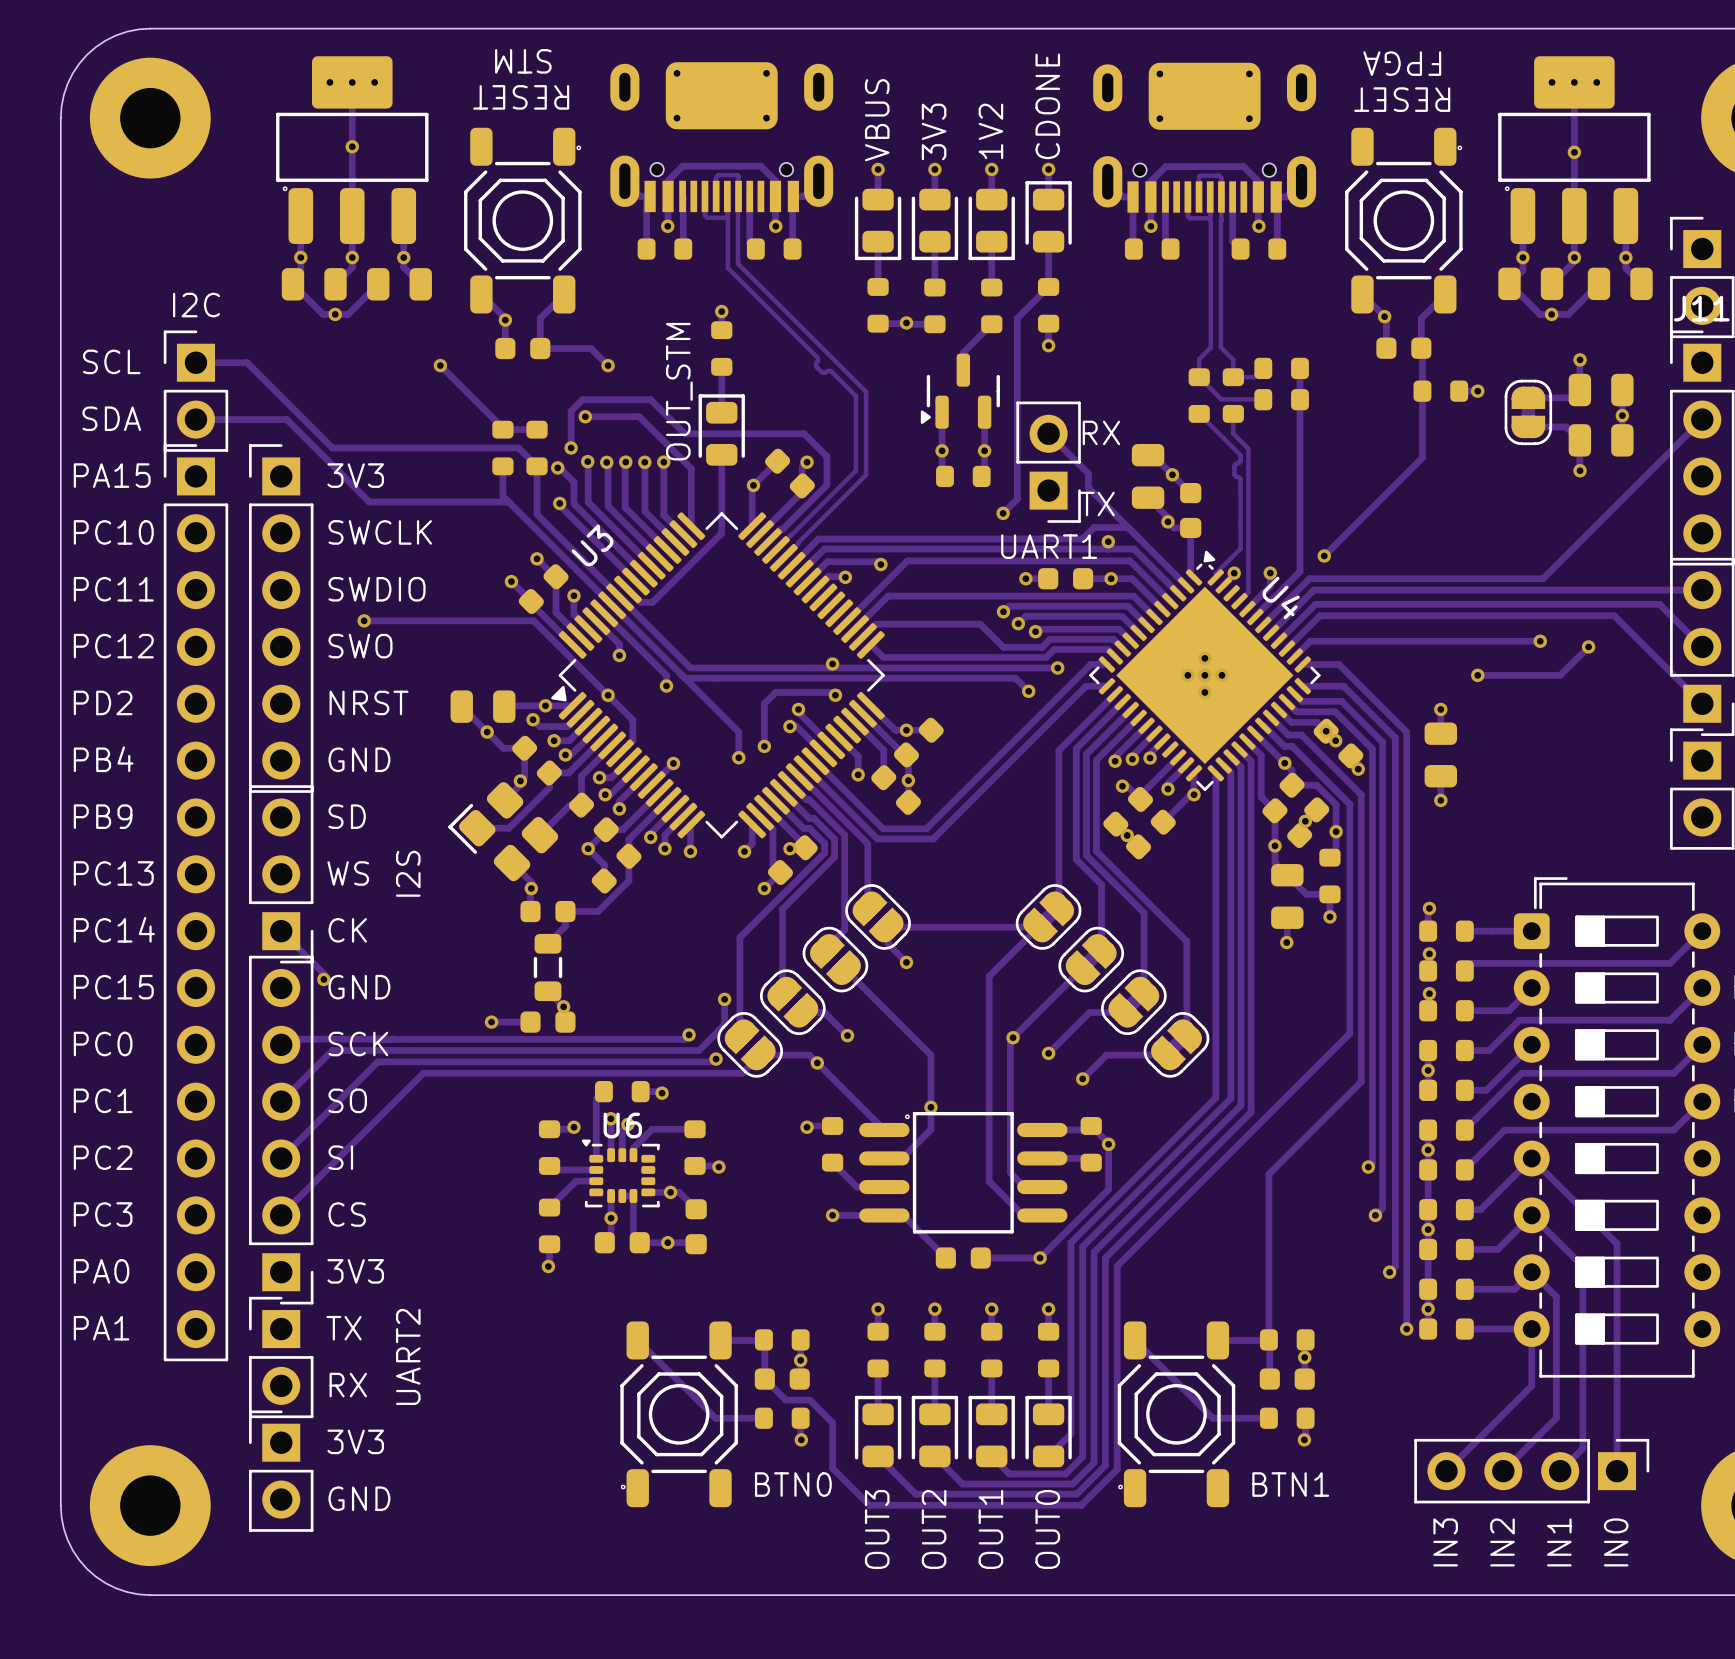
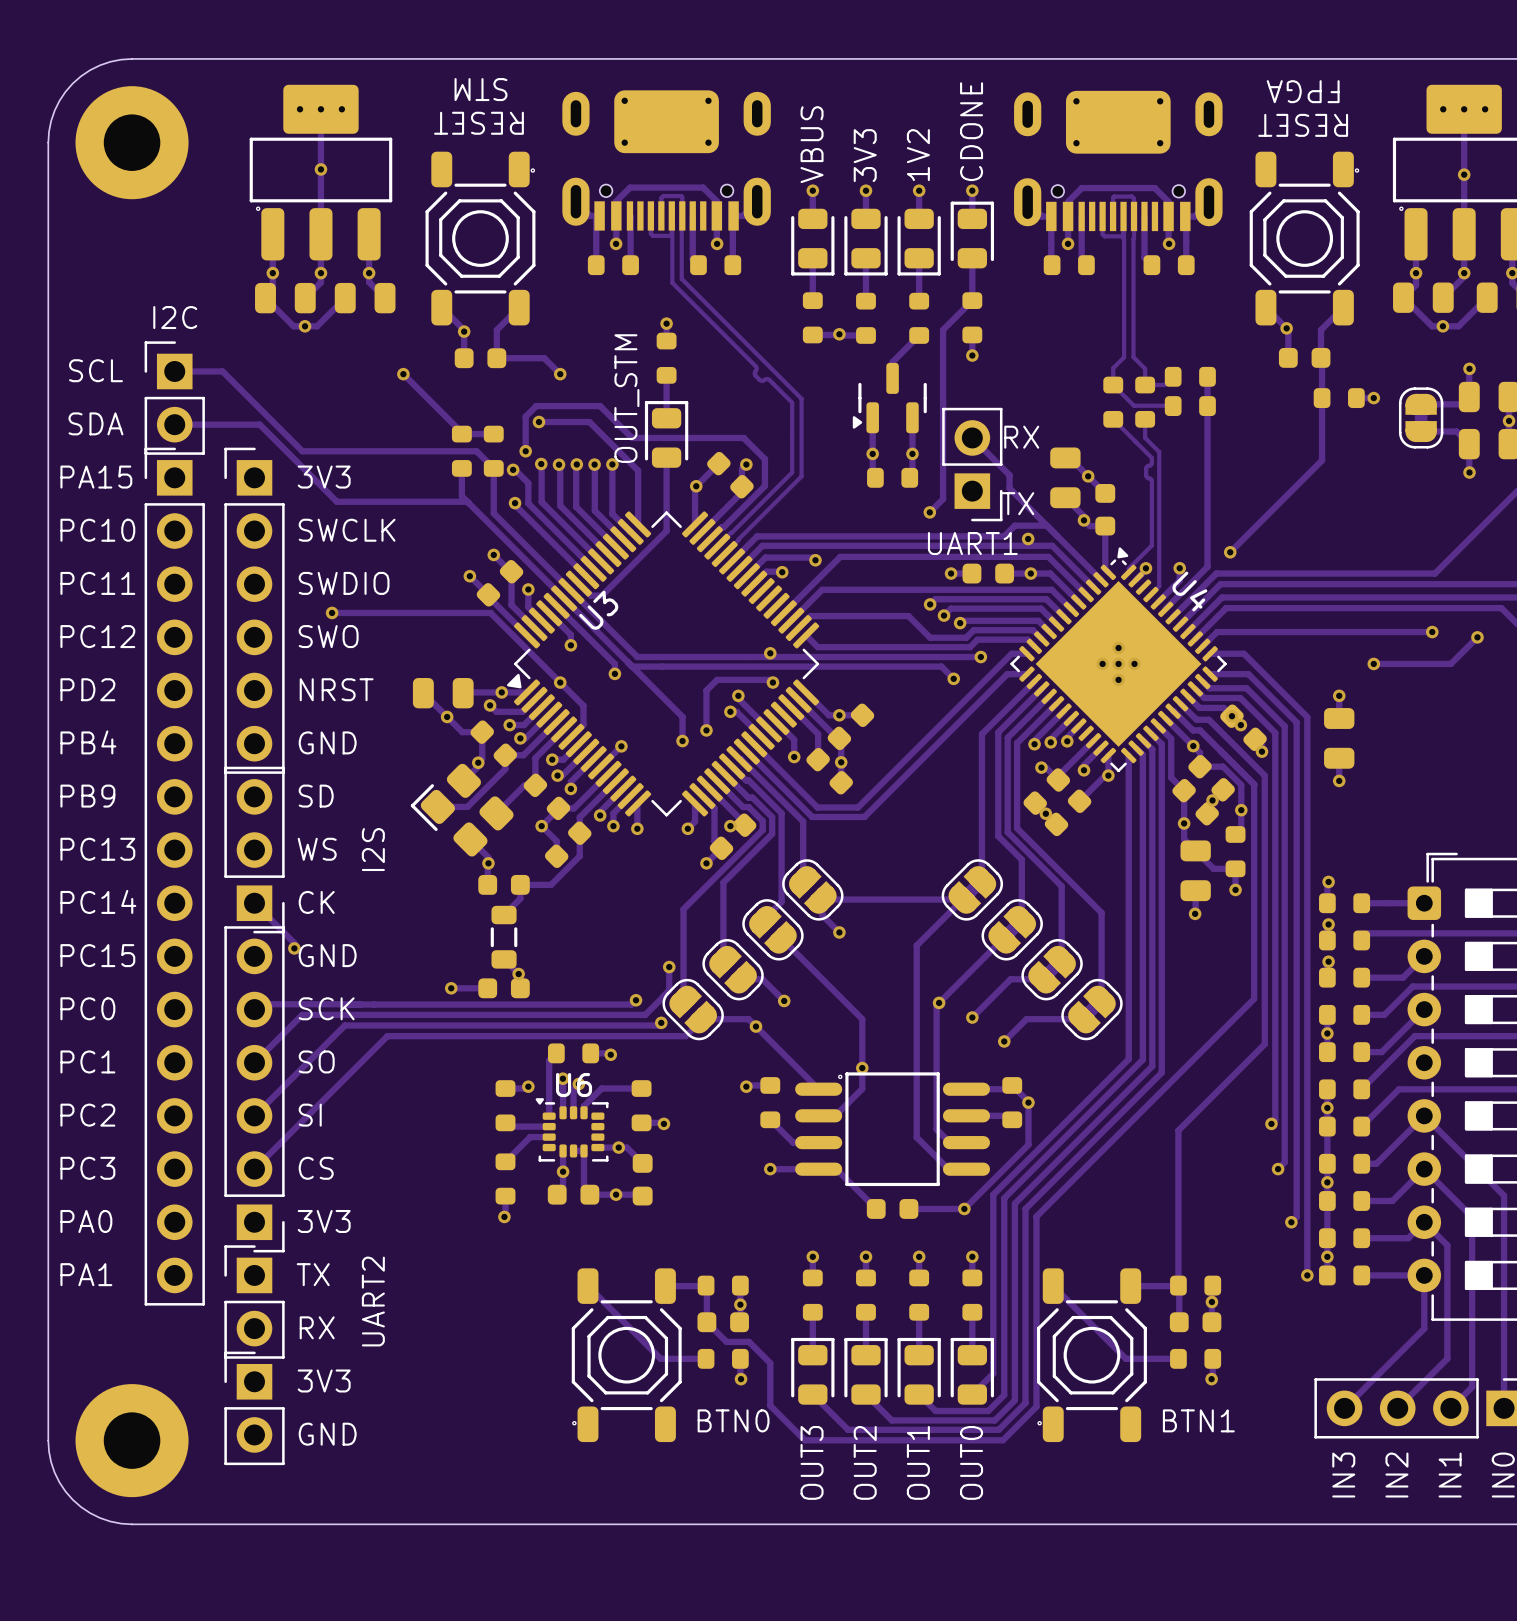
U3 name position: U3 (592, 545) -> U3 (598, 610)

